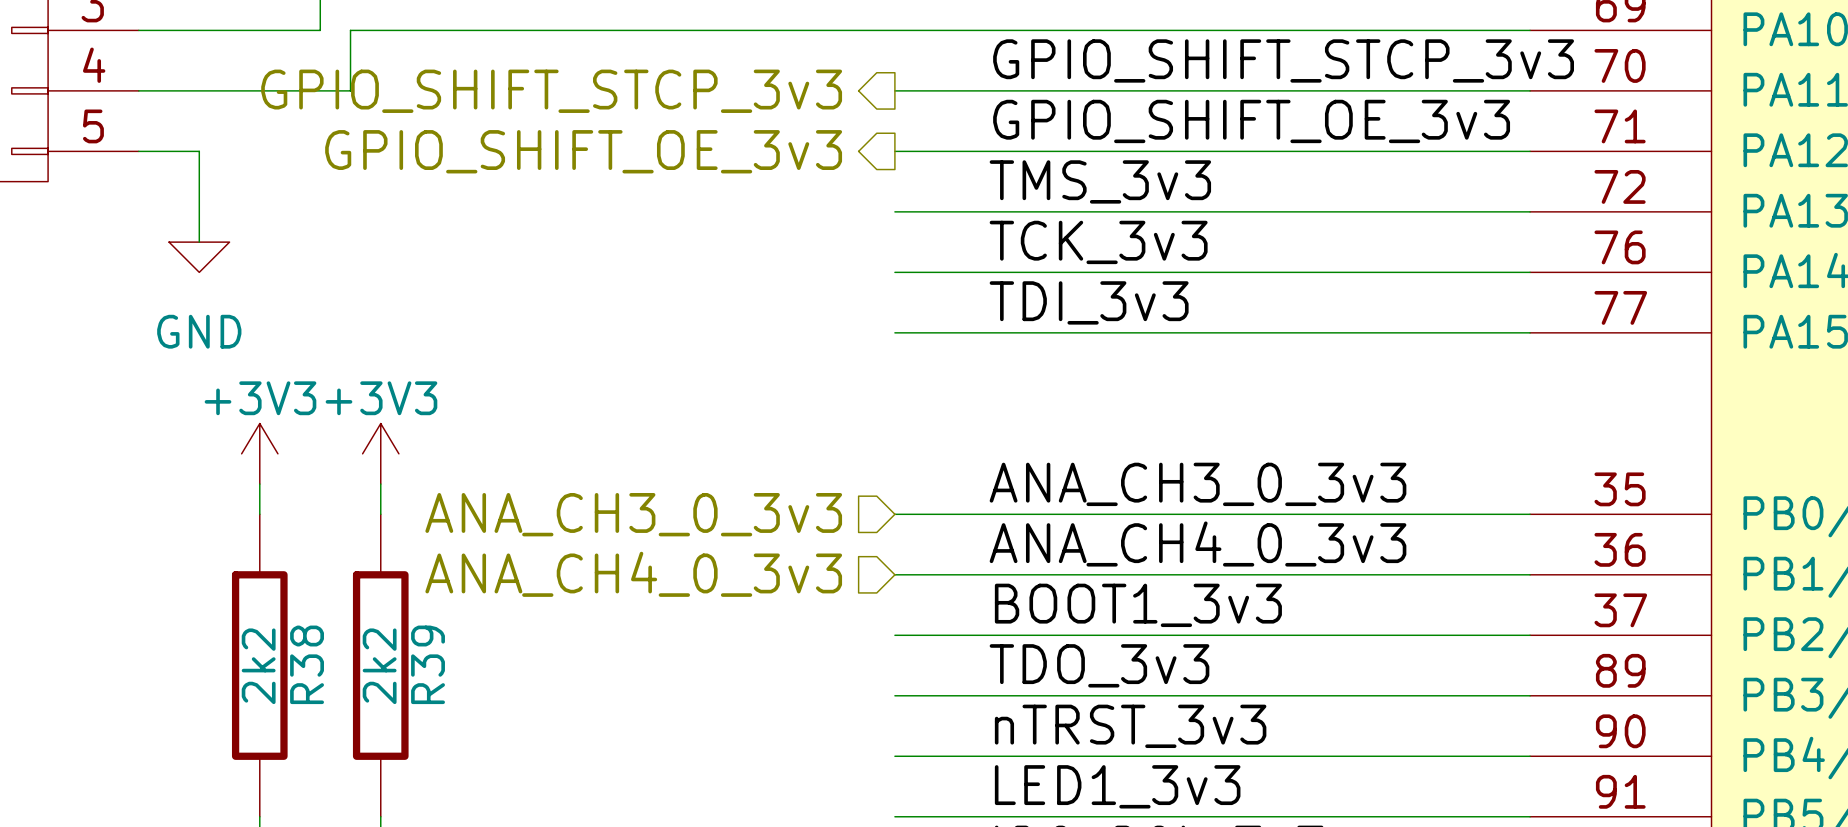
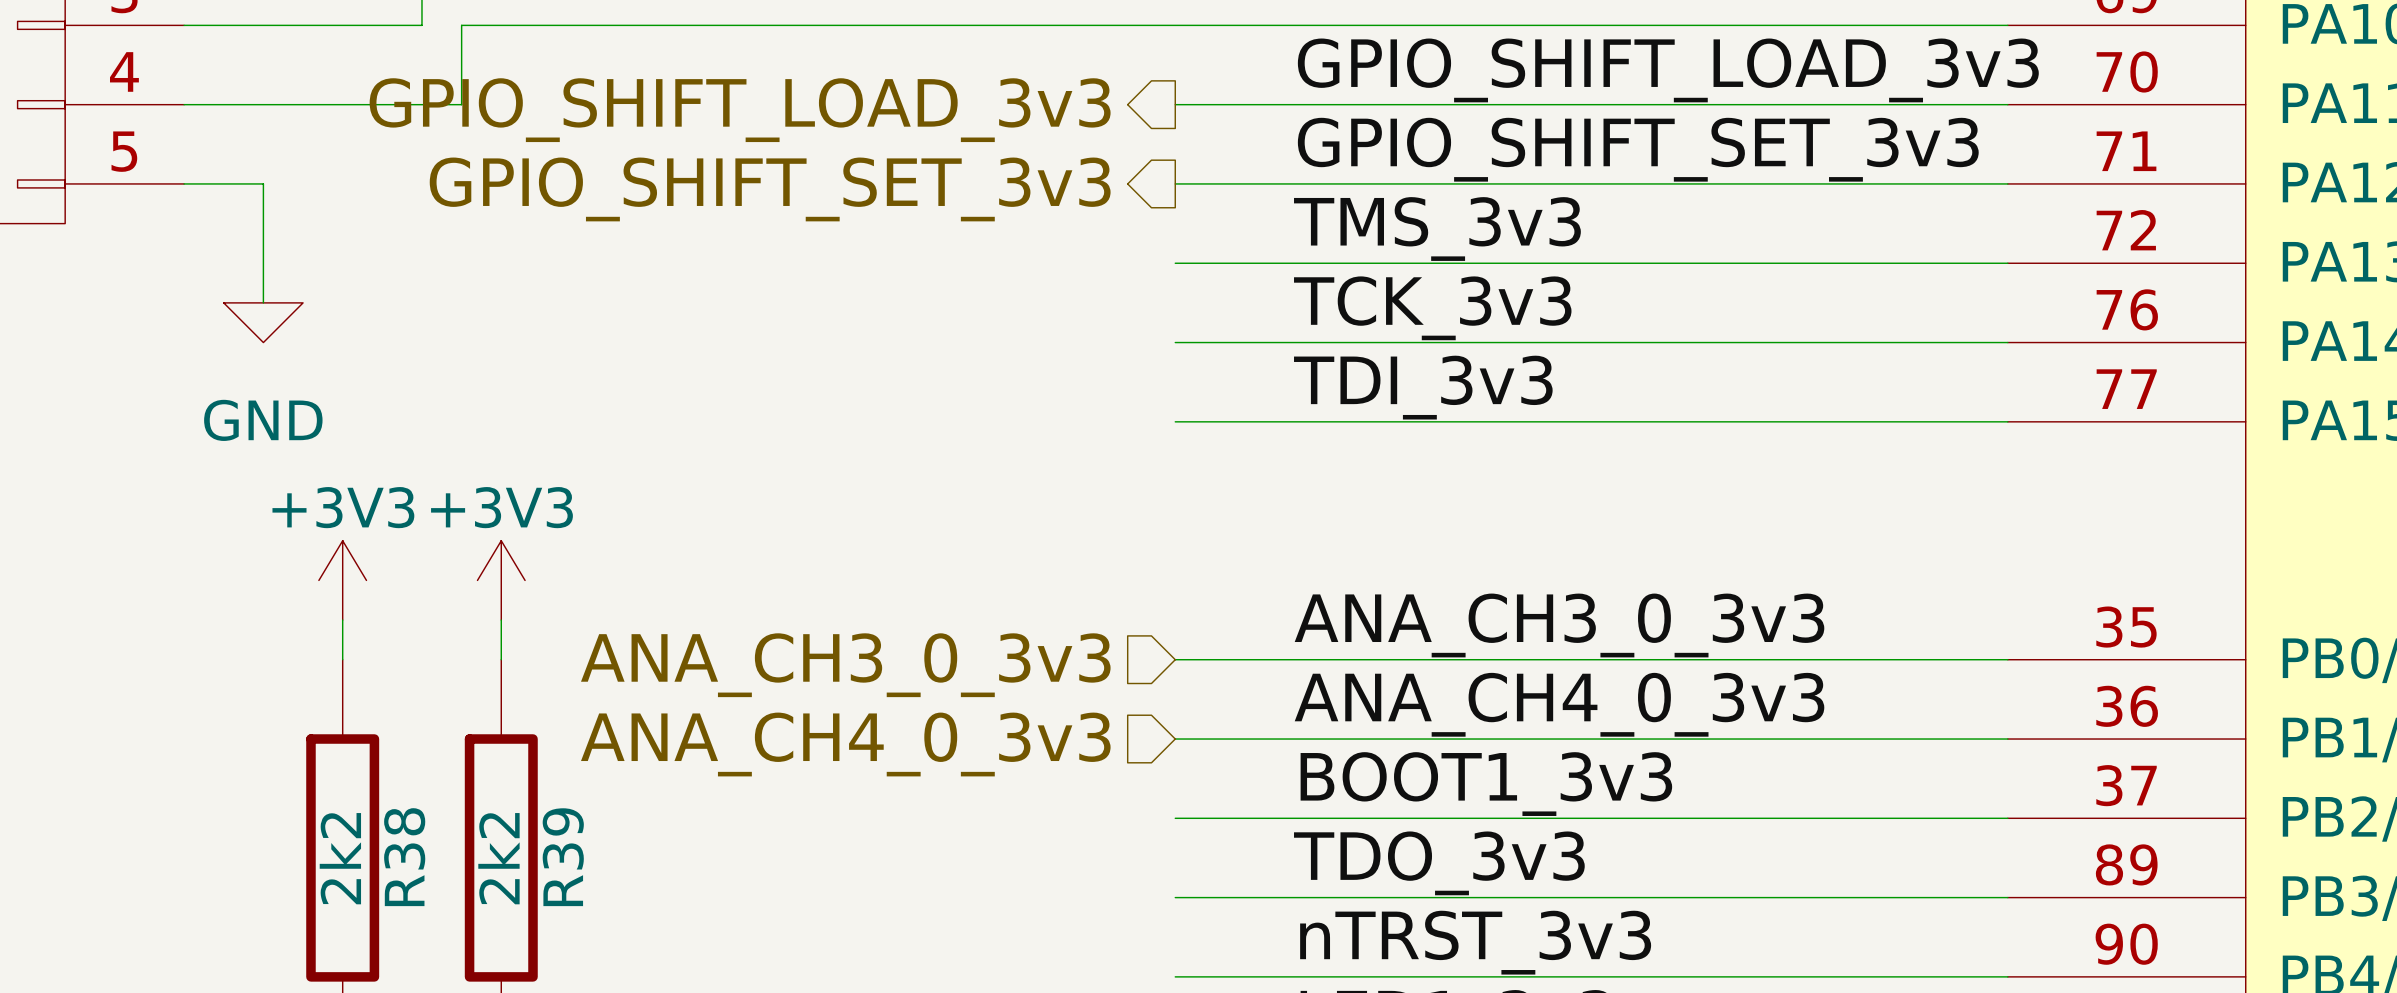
label: GPIO_SHIFT_STCP_3v3 (1283, 60) -> GPIO_SHIFT_LOAD_3v3 (1668, 70)
hierarchical label: GPIO_SHIFT_STCP_3v3 (551, 91) -> GPIO_SHIFT_LOAD_3v3 (740, 110)
label: GPIO_SHIFT_OE_3v3 (1251, 121) -> GPIO_SHIFT_SET_3v3 (1638, 149)
hierarchical label: GPIO_SHIFT_OE_3v3 (583, 151) -> GPIO_SHIFT_SET_3v3 (770, 189)

